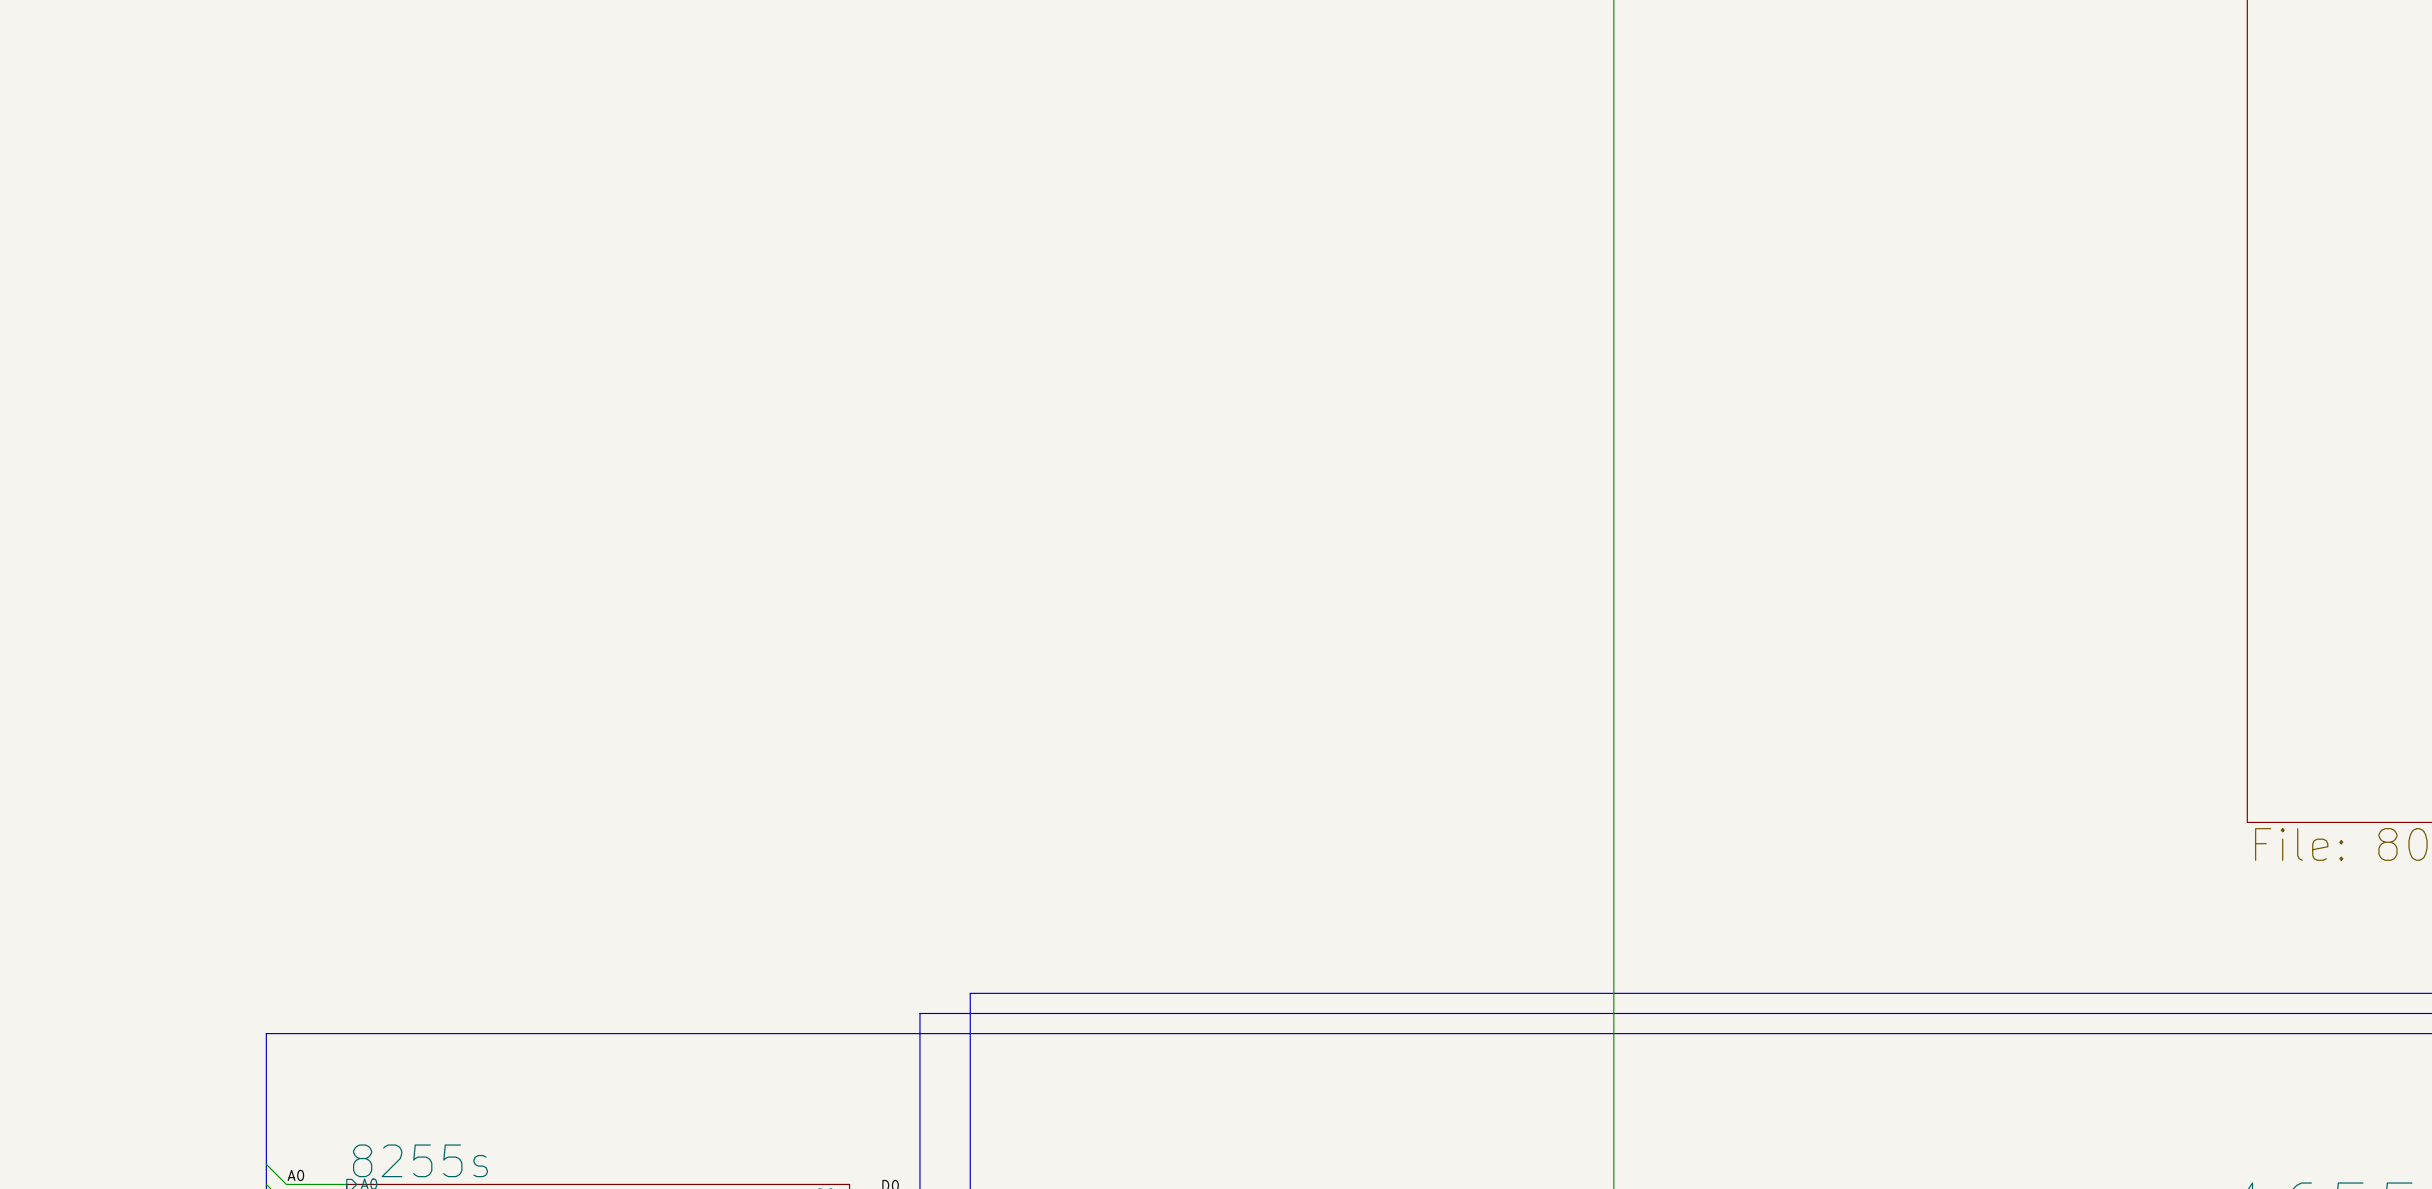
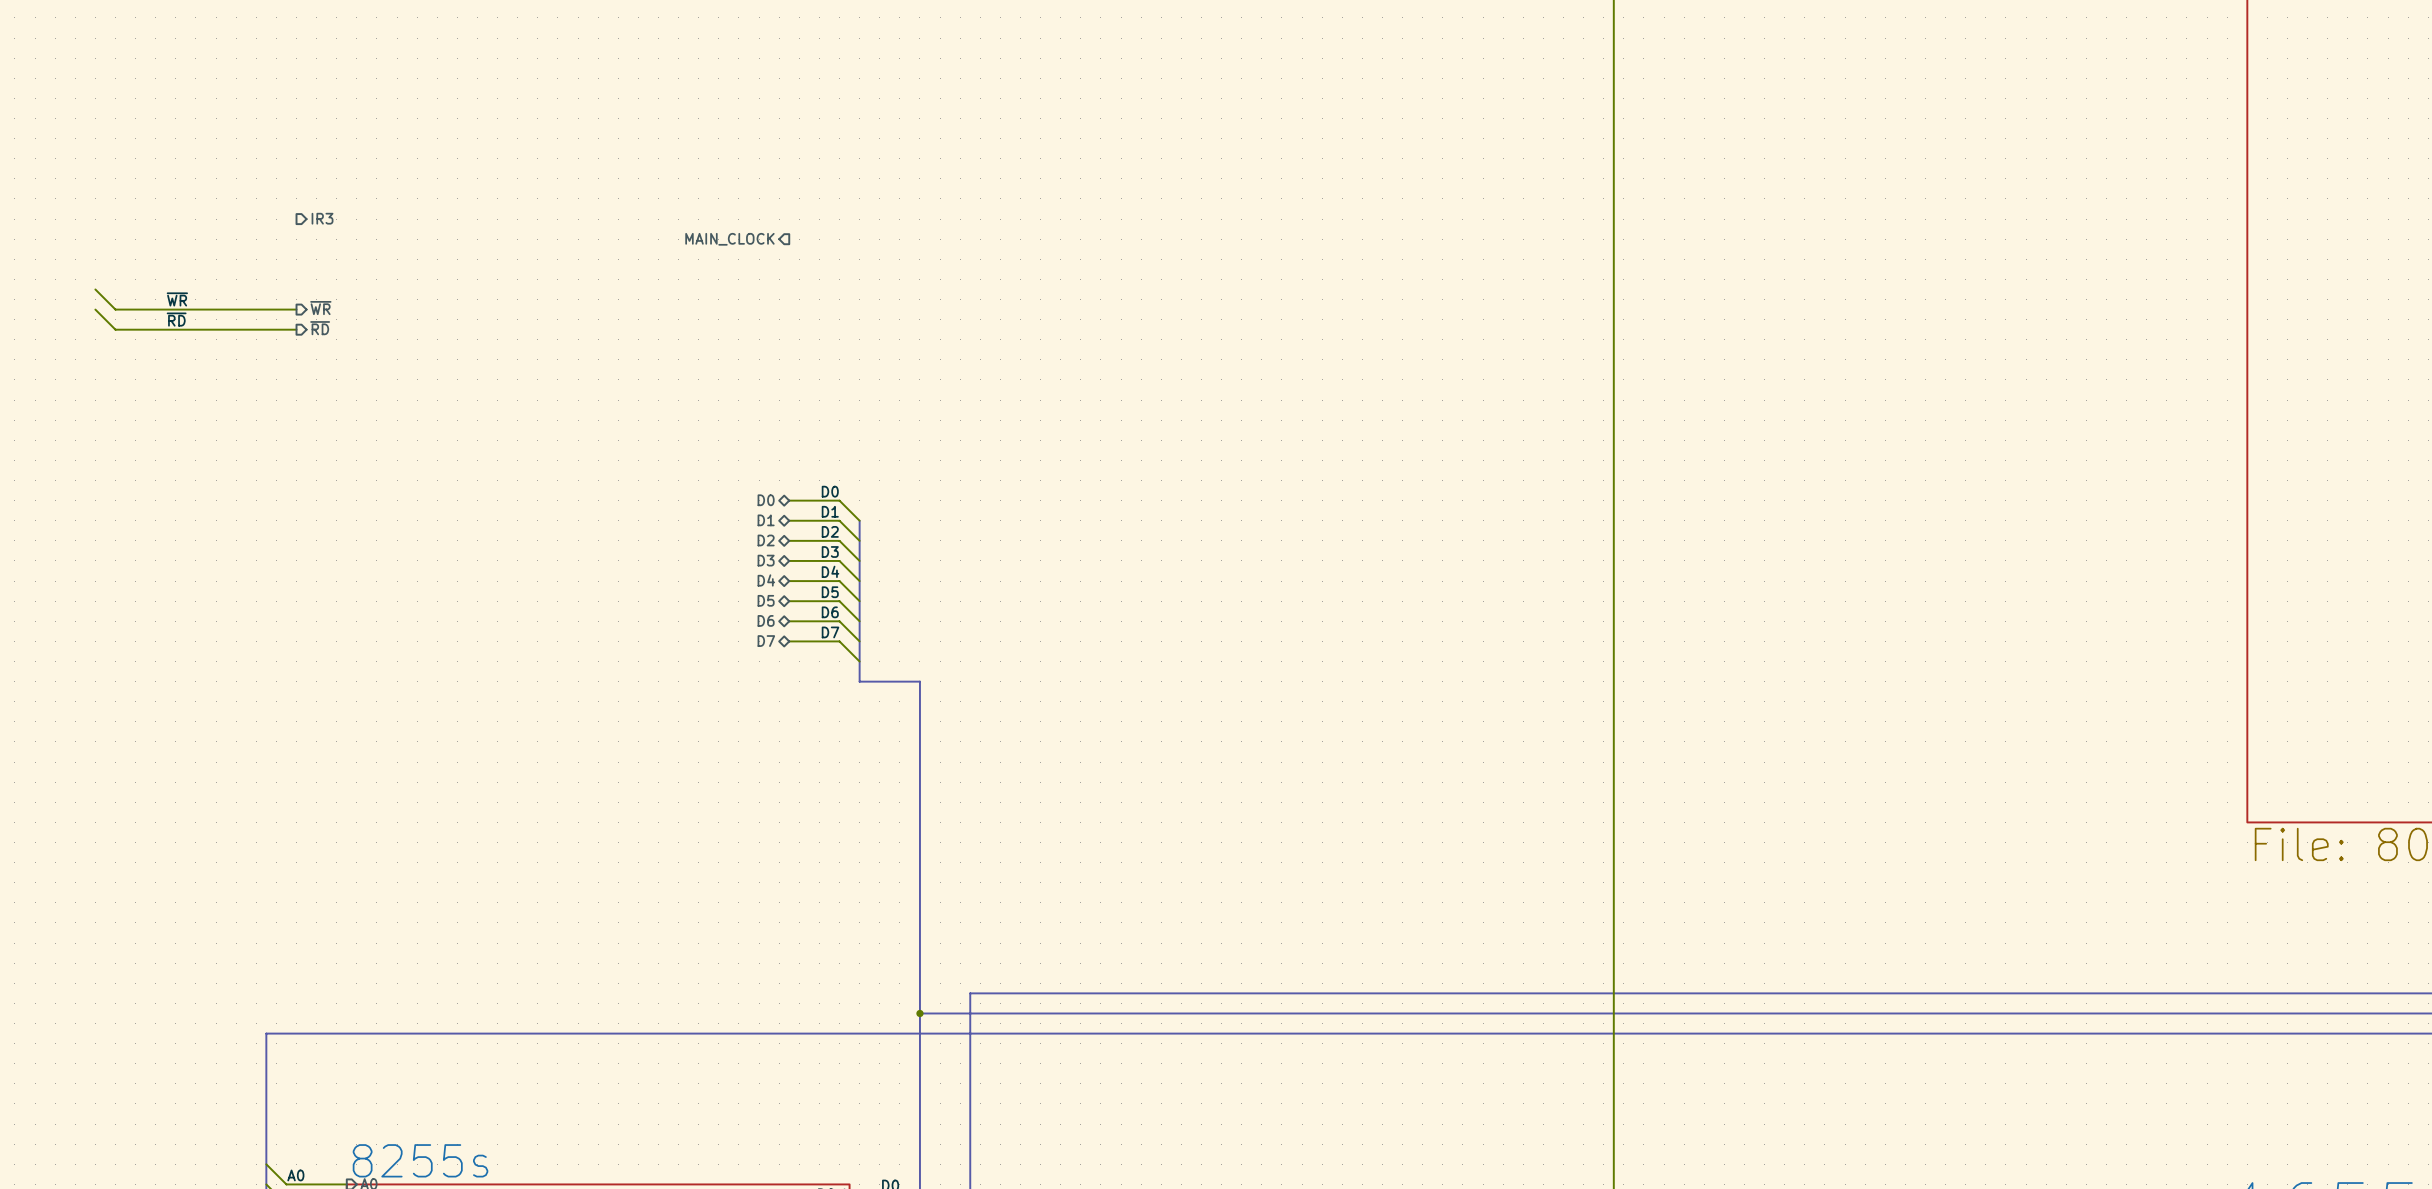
sheet pin: none -> IR3 (322, 218)
sheet pin: none -> MAIN_CLOCK (729, 239)
wire: none -> (95, 289) (115, 309) (296, 309)
label: none -> ~{WR} (177, 299)
sheet pin: none -> ~{WR} (320, 308)
wire: none -> (95, 309) (115, 329) (296, 329)
label: none -> ~{RD} (176, 319)
sheet pin: none -> ~{RD} (320, 328)
label: none -> D0 (830, 491)
sheet pin: none -> D0 (766, 500)
wire: none -> (789, 500) (839, 500) (859, 520)
label: none -> D1 (830, 511)
sheet pin: none -> D1 (766, 520)
wire: none -> (789, 520) (839, 520) (859, 540)
bus: none -> (859, 520) (859, 681) (919, 681) (919, 1013)
label: none -> D2 (830, 531)
sheet pin: none -> D2 (766, 540)
wire: none -> (789, 540) (839, 540) (859, 560)
label: none -> D3 (830, 552)
sheet pin: none -> D3 (766, 560)
wire: none -> (789, 560) (839, 560) (859, 581)
label: none -> D4 (830, 571)
sheet pin: none -> D4 (766, 580)
wire: none -> (789, 581) (839, 581) (859, 601)
label: none -> D5 (830, 592)
sheet pin: none -> D5 (766, 600)
wire: none -> (789, 601) (839, 601) (859, 621)
label: none -> D6 (830, 612)
sheet pin: none -> D6 (766, 620)
wire: none -> (789, 621) (839, 621) (859, 641)
label: none -> D7 (830, 632)
sheet pin: none -> D7 (766, 641)
wire: none -> (789, 641) (839, 641) (859, 661)
junction: none -> (919, 1013)

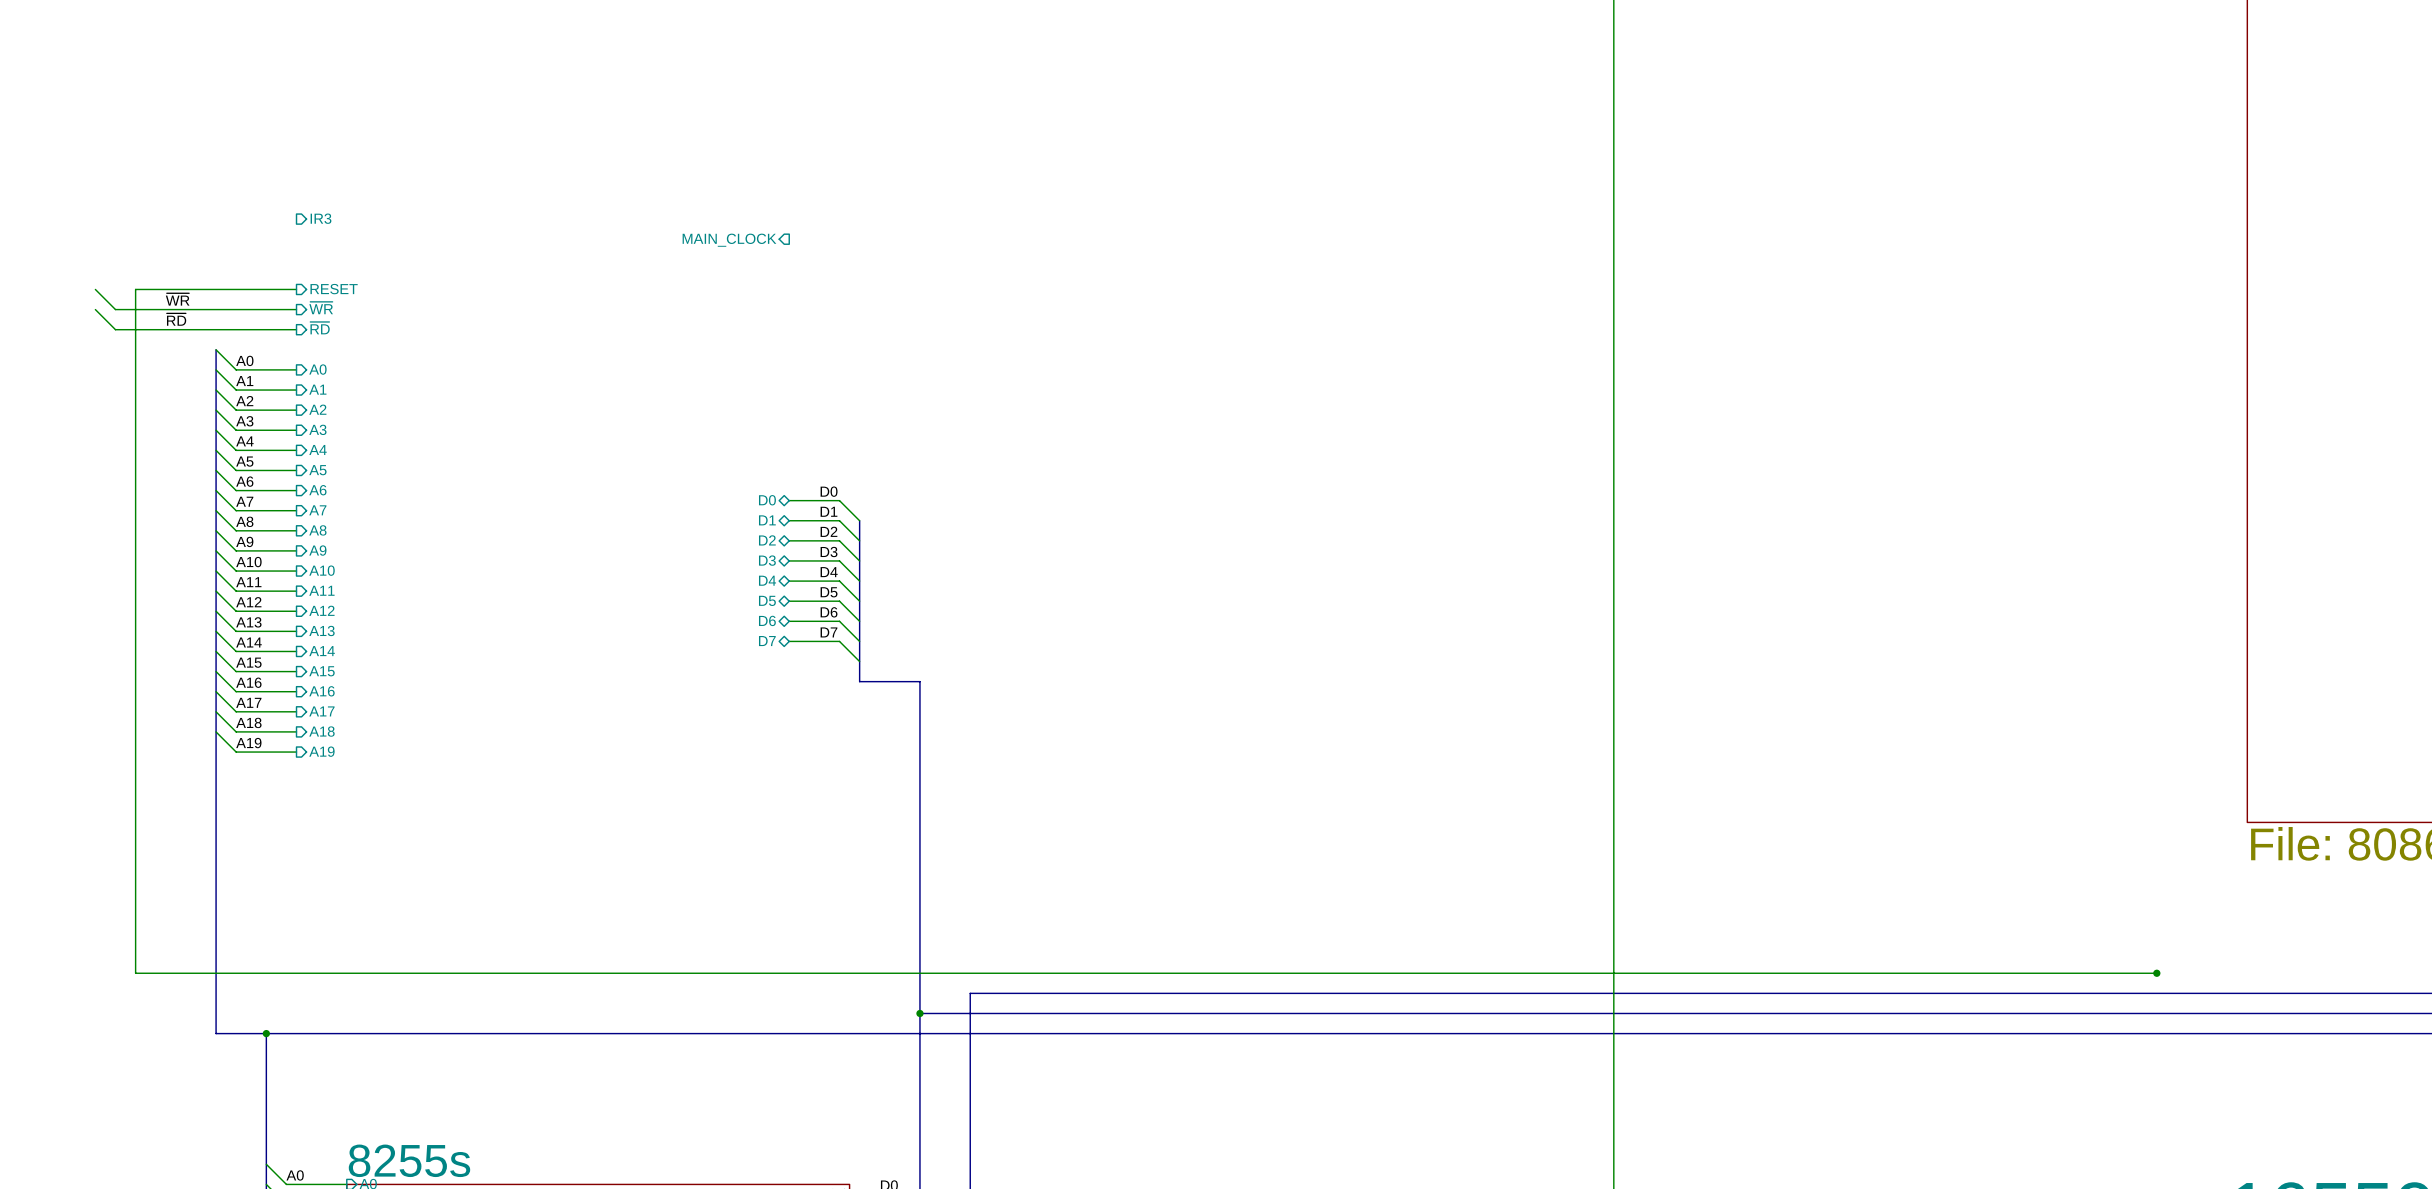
wire: none -> (296, 289) (135, 289) (135, 973) (2156, 973)
sheet pin: none -> RESET (334, 289)
wire: none -> (216, 349) (236, 369) (296, 369)
bus: none -> (216, 349) (216, 1033) (266, 1033)
label: none -> A0 (244, 360)
wire: none -> (216, 369) (236, 390) (296, 390)
sheet pin: none -> A0 (317, 369)
label: none -> A1 (244, 381)
sheet pin: none -> A1 (317, 389)
wire: none -> (216, 390) (236, 410) (296, 410)
label: none -> A2 (244, 401)
sheet pin: none -> A2 (317, 409)
wire: none -> (216, 410) (236, 430) (296, 430)
label: none -> A3 (244, 421)
sheet pin: none -> A3 (317, 429)
wire: none -> (216, 430) (236, 450) (296, 450)
label: none -> A4 (244, 441)
sheet pin: none -> A4 (318, 449)
wire: none -> (216, 450) (236, 470) (296, 470)
label: none -> A5 (244, 461)
wire: none -> (216, 470) (236, 490) (296, 490)
sheet pin: none -> A5 (317, 470)
label: none -> A6 (244, 481)
wire: none -> (216, 490) (236, 510) (296, 510)
sheet pin: none -> A6 (317, 490)
label: none -> A7 (244, 501)
wire: none -> (216, 510) (236, 530) (296, 530)
sheet pin: none -> A7 (317, 510)
label: none -> A8 (244, 521)
wire: none -> (216, 530) (236, 550) (296, 550)
sheet pin: none -> A8 (317, 530)
label: none -> A9 (244, 541)
wire: none -> (216, 550) (236, 571) (296, 571)
sheet pin: none -> A9 (317, 550)
label: none -> A10 (248, 562)
sheet pin: none -> A10 (322, 570)
wire: none -> (216, 571) (236, 591) (296, 591)
label: none -> A11 (248, 582)
sheet pin: none -> A11 (321, 590)
wire: none -> (216, 591) (236, 611) (296, 611)
label: none -> A12 (248, 602)
sheet pin: none -> A12 (321, 610)
wire: none -> (216, 611) (236, 631) (296, 631)
label: none -> A13 (248, 622)
sheet pin: none -> A13 (321, 630)
wire: none -> (216, 631) (236, 651) (296, 651)
label: none -> A14 (248, 642)
sheet pin: none -> A14 (322, 651)
wire: none -> (216, 651) (236, 671) (296, 671)
label: none -> A15 (248, 662)
wire: none -> (216, 671) (236, 691) (296, 691)
sheet pin: none -> A15 (321, 671)
label: none -> A16 (248, 682)
wire: none -> (216, 691) (236, 711) (296, 711)
sheet pin: none -> A16 (321, 691)
label: none -> A17 (248, 702)
wire: none -> (216, 711) (236, 731) (296, 731)
sheet pin: none -> A17 (321, 711)
label: none -> A18 (248, 722)
wire: none -> (216, 731) (236, 752) (296, 752)
sheet pin: none -> A18 (321, 731)
label: none -> A19 (248, 743)
sheet pin: none -> A19 (321, 751)
junction: none -> (2156, 973)
junction: none -> (266, 1033)

